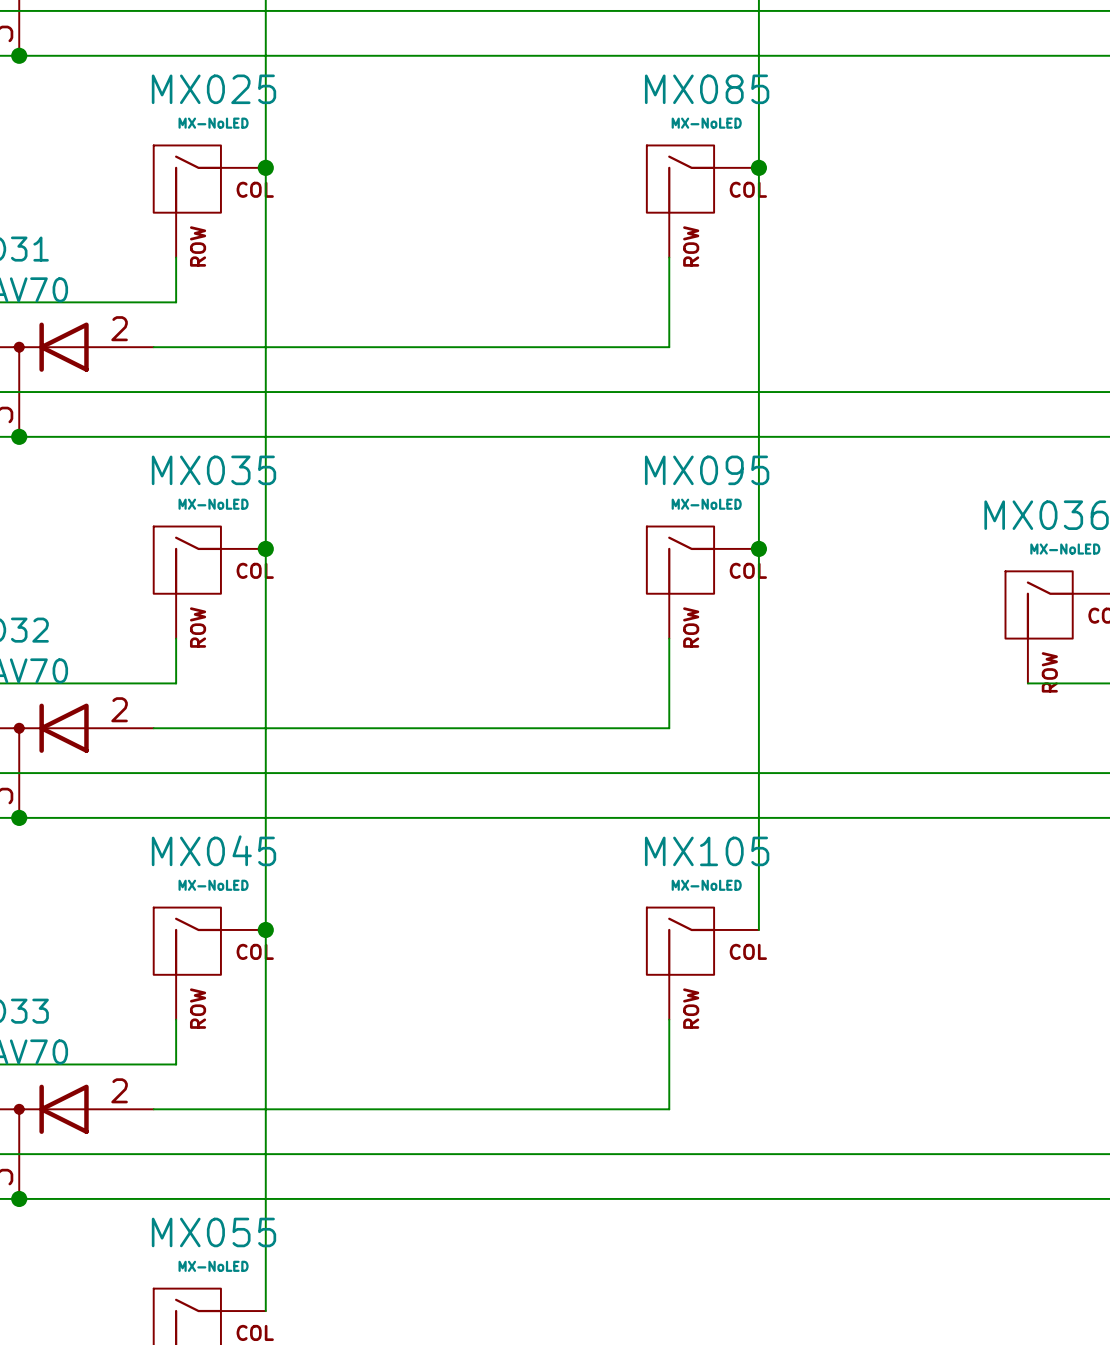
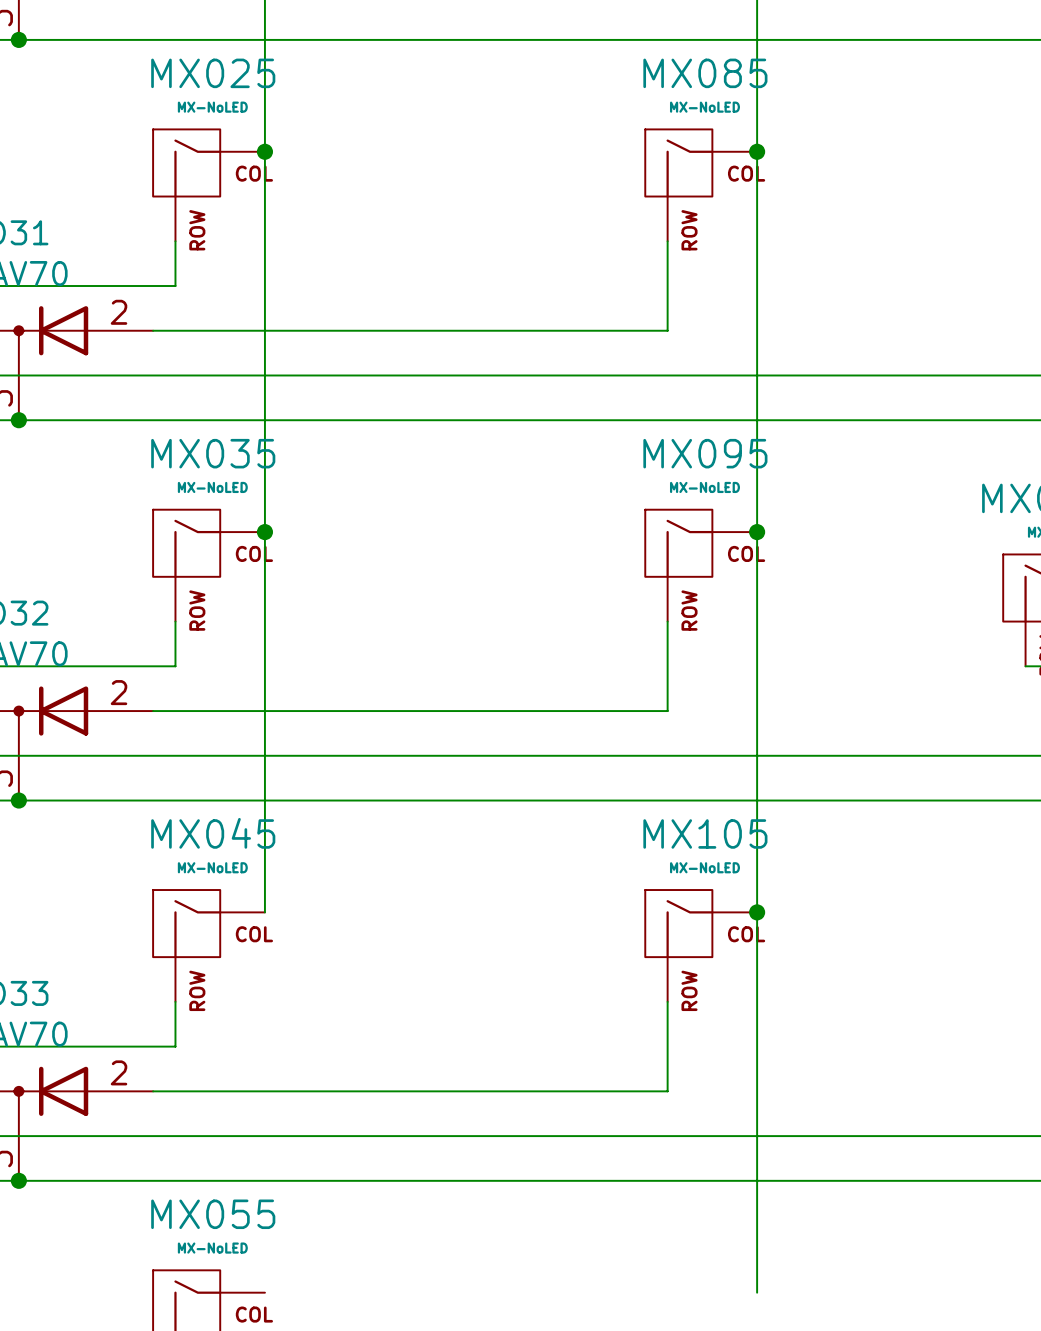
wire: (265, 929) (265, 1311) -> none
junction: (265, 929) -> none
wire: none -> (757, 912) (757, 1292)
junction: none -> (757, 912)

